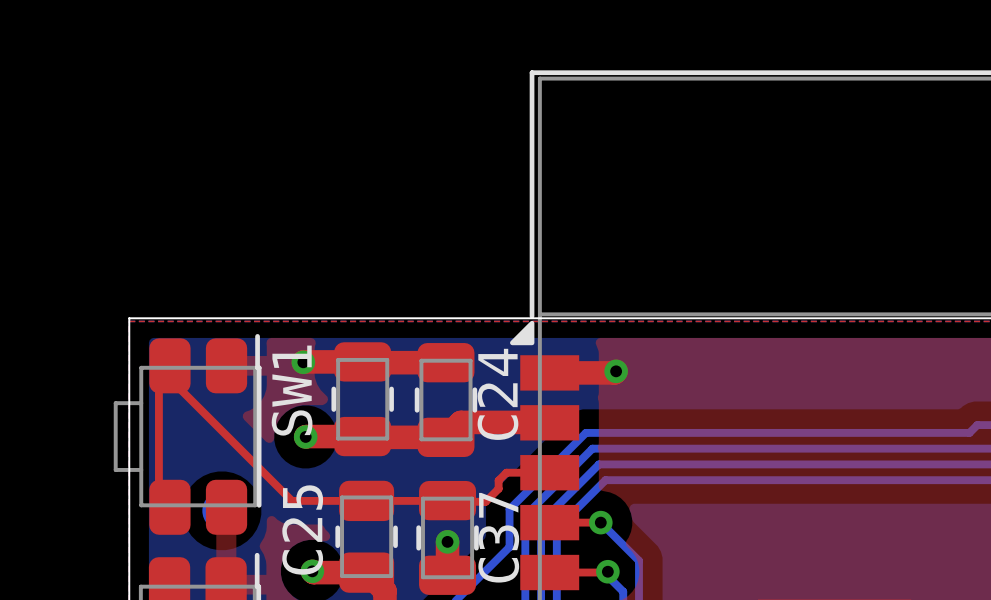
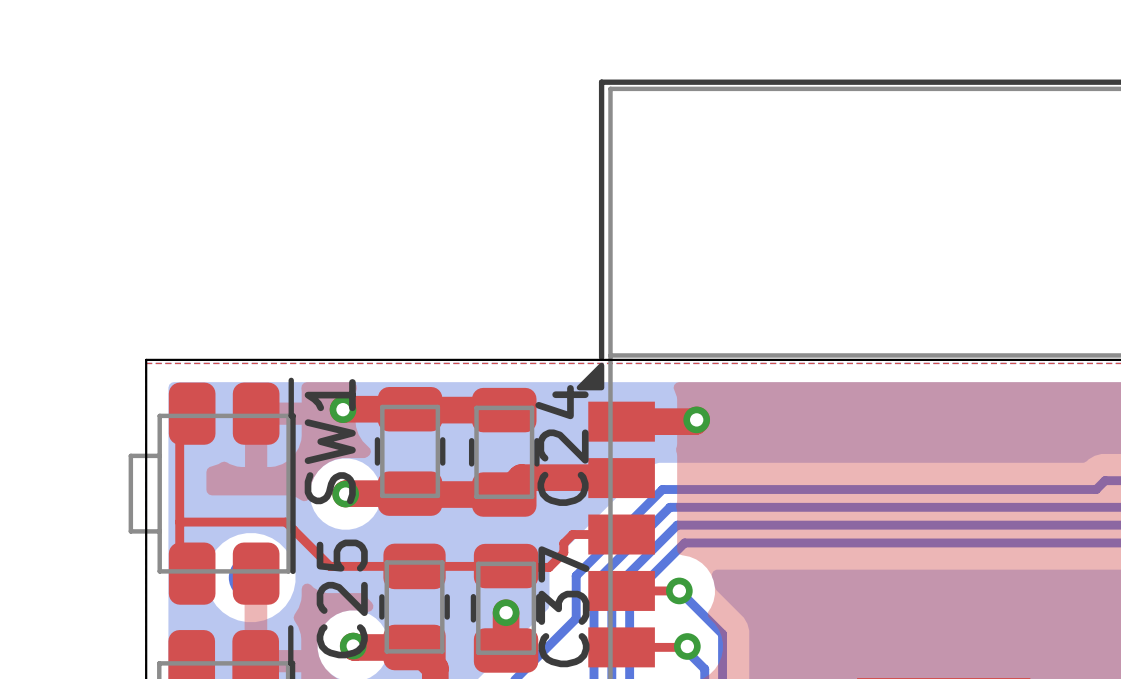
top track: (169, 378) (252, 461) -> (179, 522) (285, 522)

